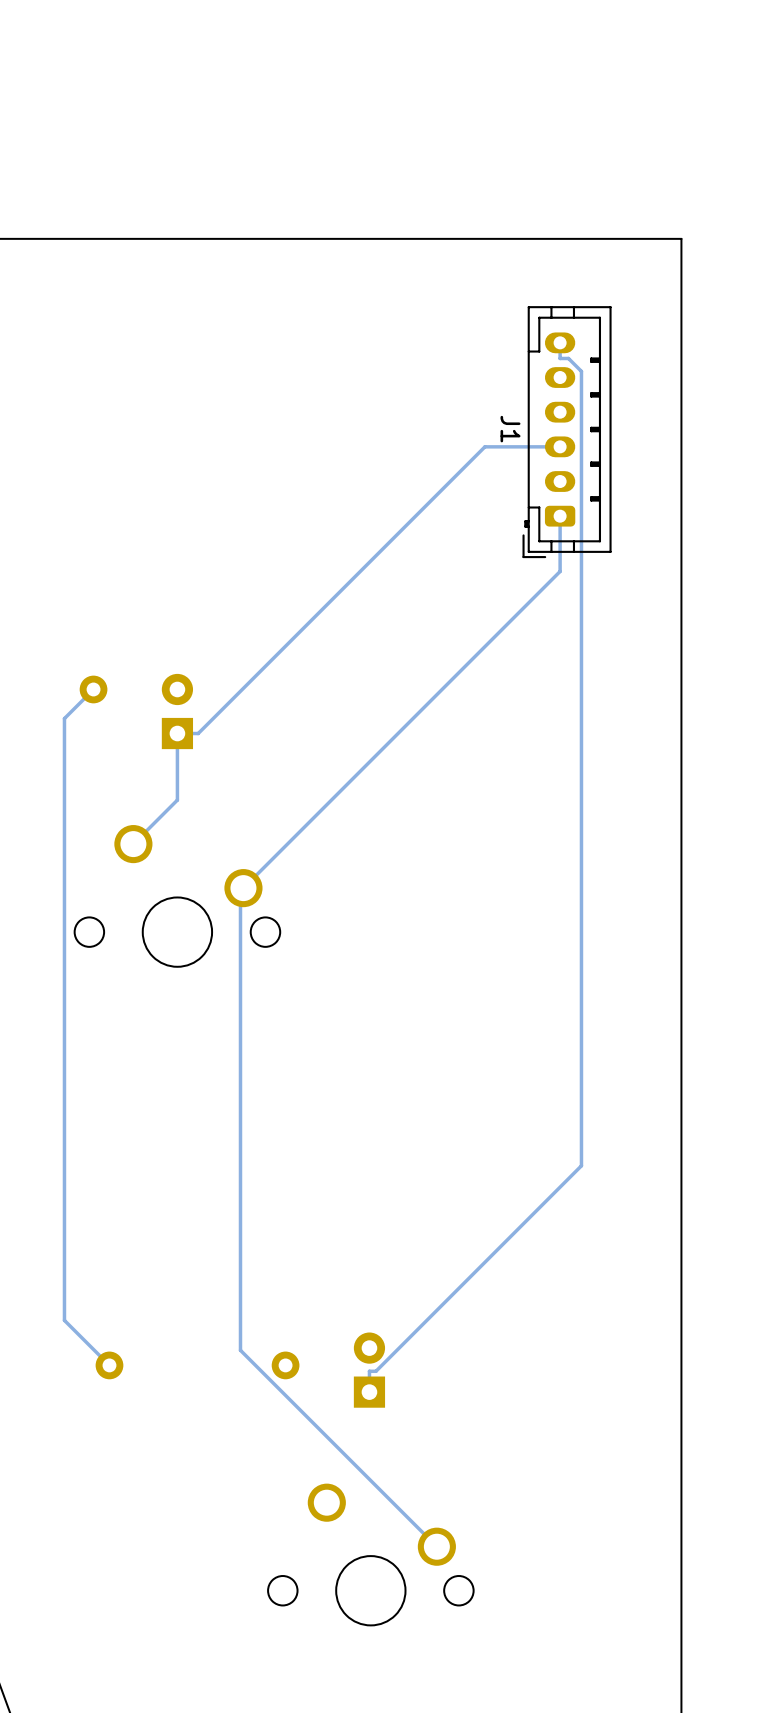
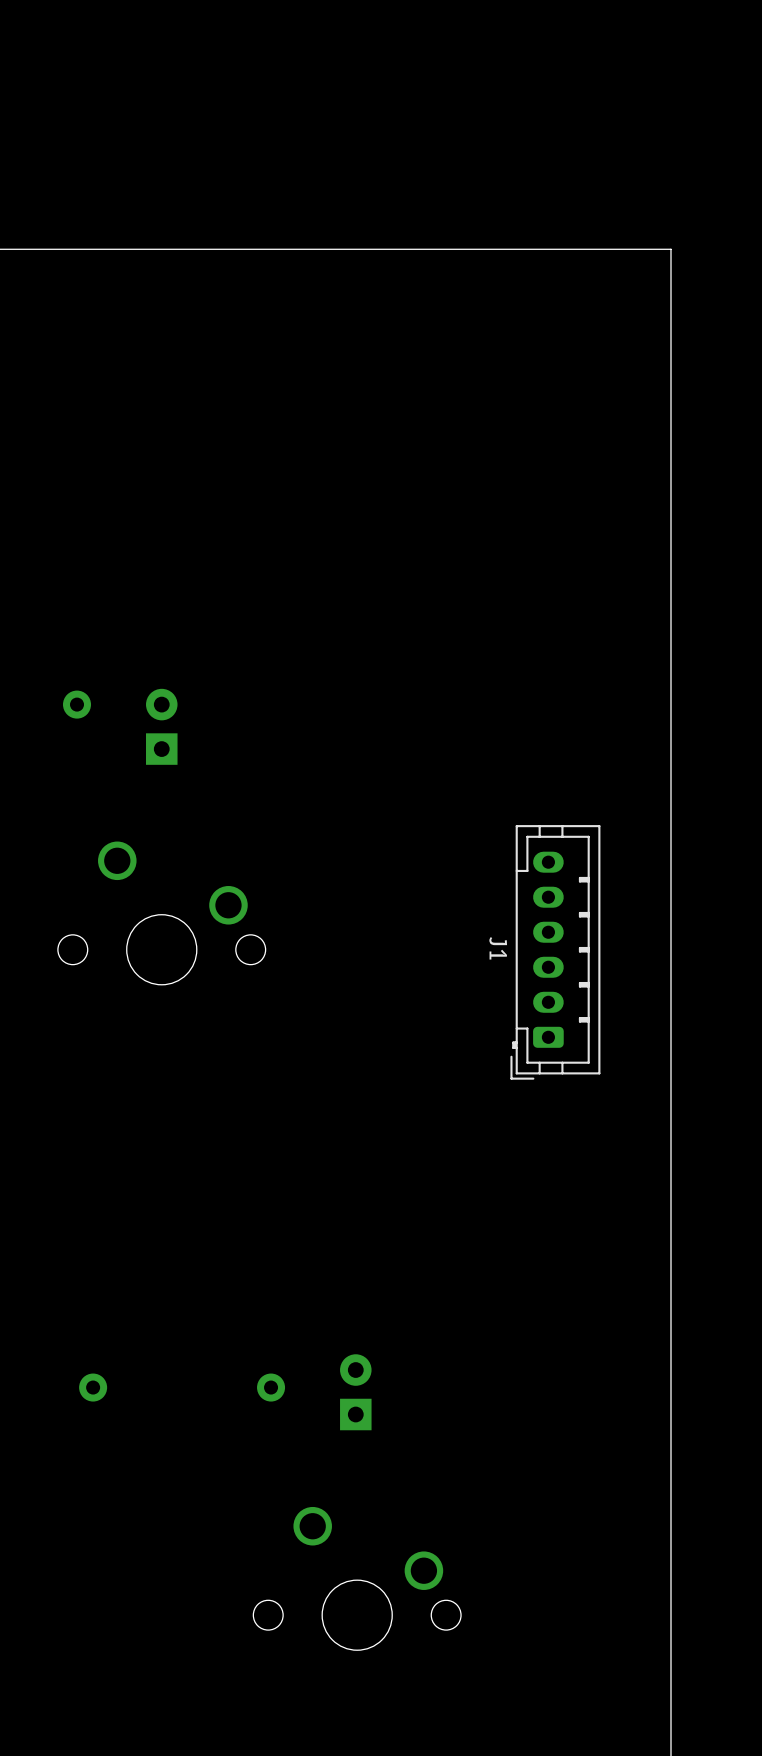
track: (560, 342) (560, 358) (568, 358) (581, 371) (581, 1165) (375, 1371) (369, 1371) (369, 1392) -> none
J1 position: (567, 432) -> (555, 952)
track: (560, 446) (484, 446) (198, 733) (177, 733) (177, 800) (133, 844) -> none
track: (560, 516) (560, 571) (240, 891) (240, 1350) (436, 1546) -> none
track: (93, 689) (64, 718) (64, 1320) (109, 1365) -> none

